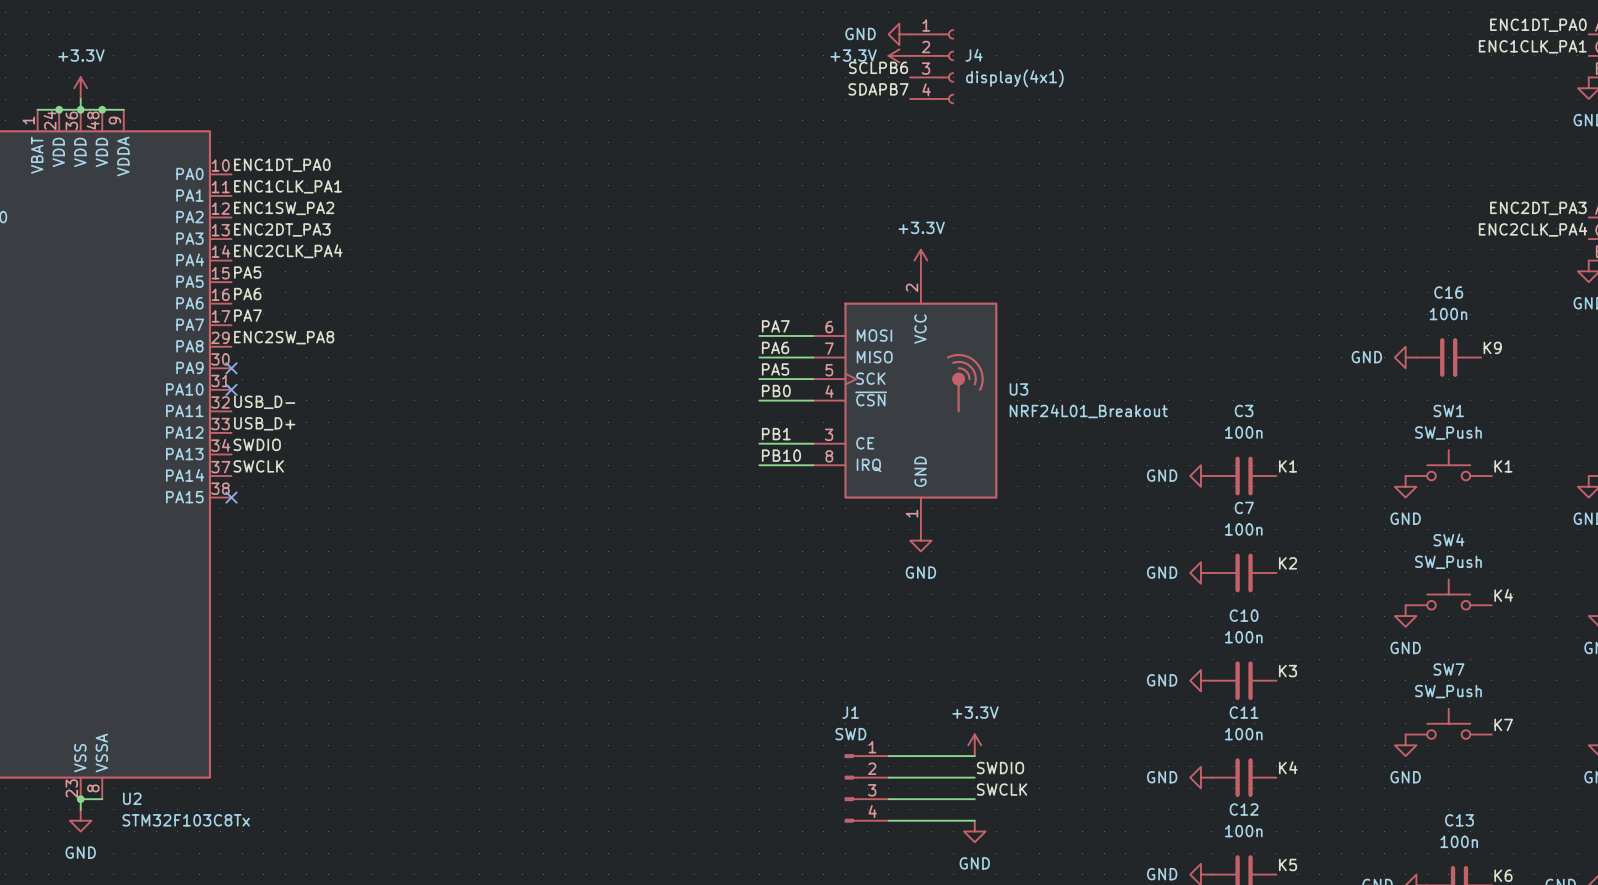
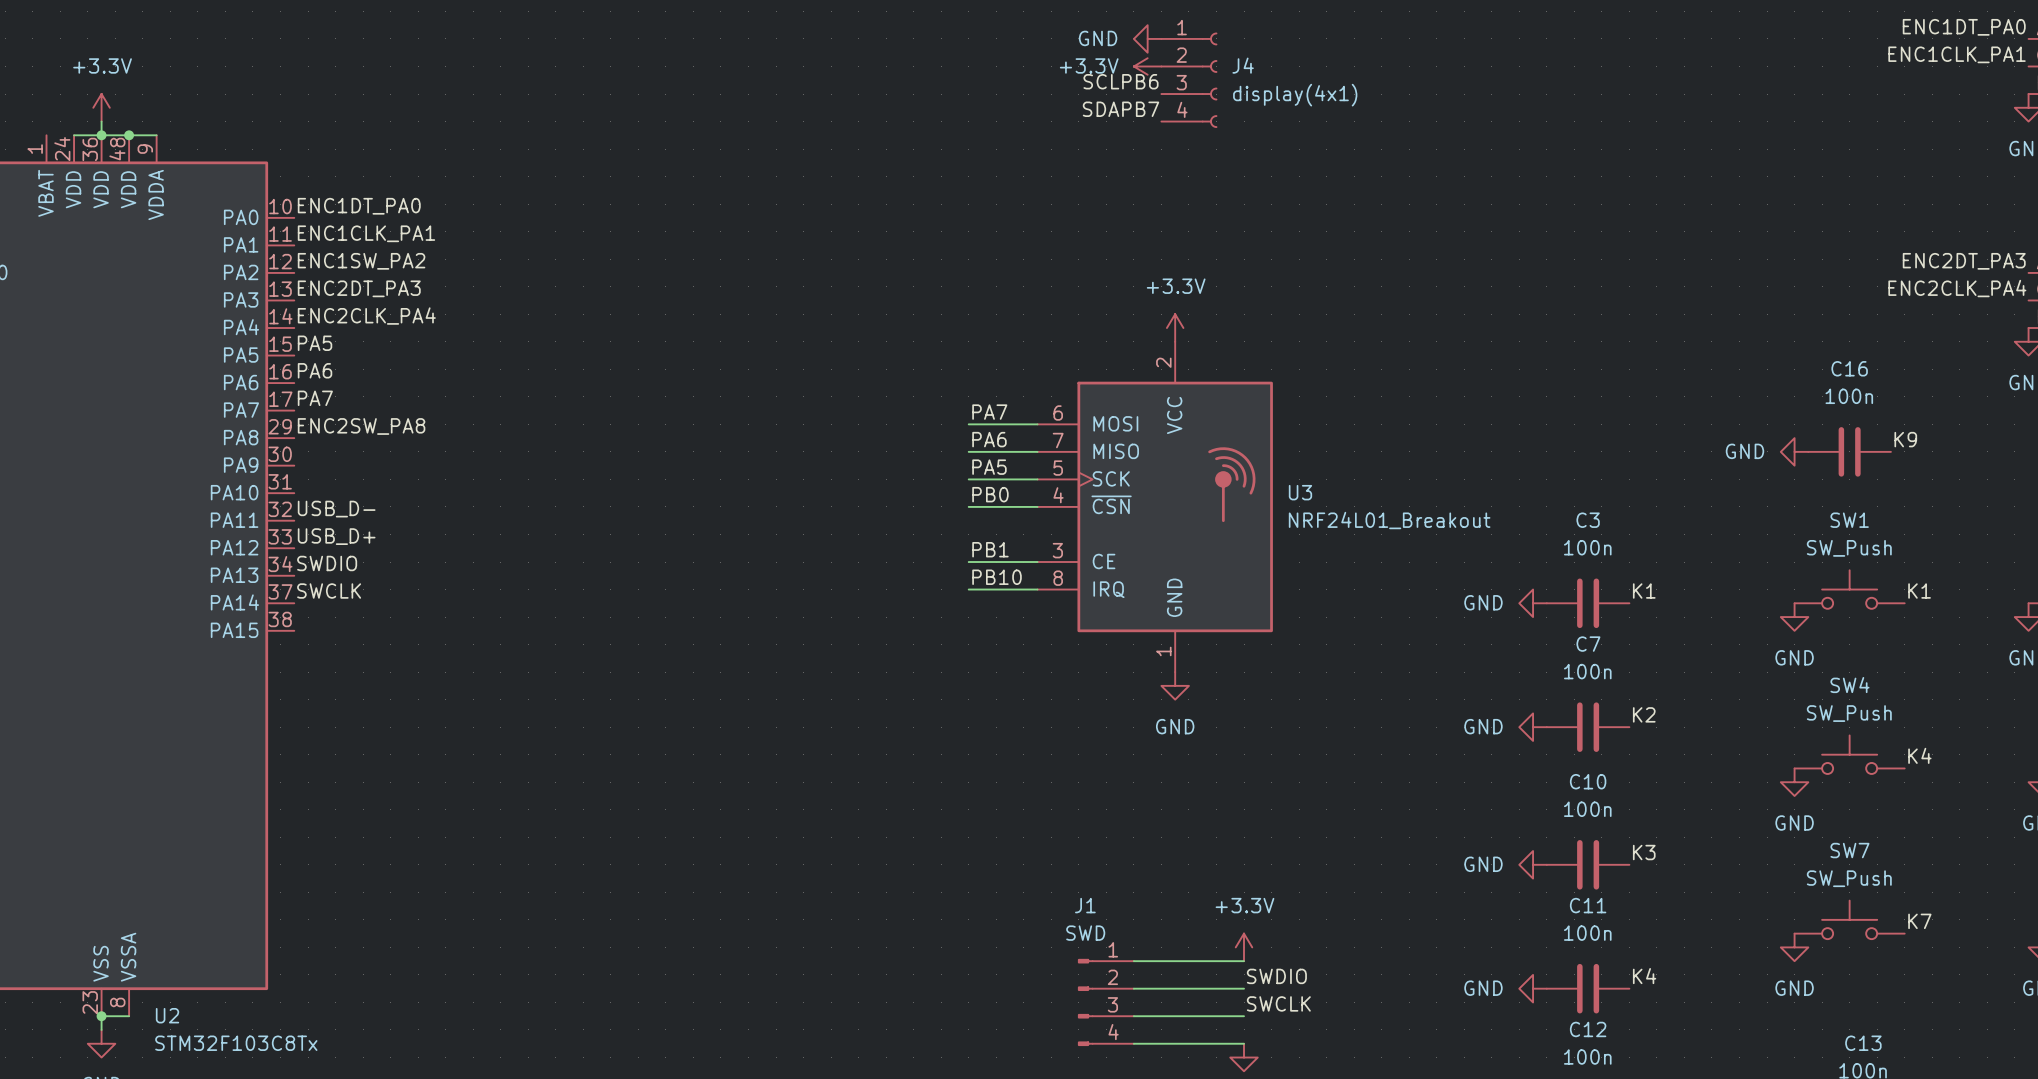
wire: (37, 109) (59, 109) -> none
junction: (59, 109) -> none
no-connect mark: (231, 368) -> none
no-connect mark: (231, 389) -> none
no-connect mark: (231, 497) -> none

